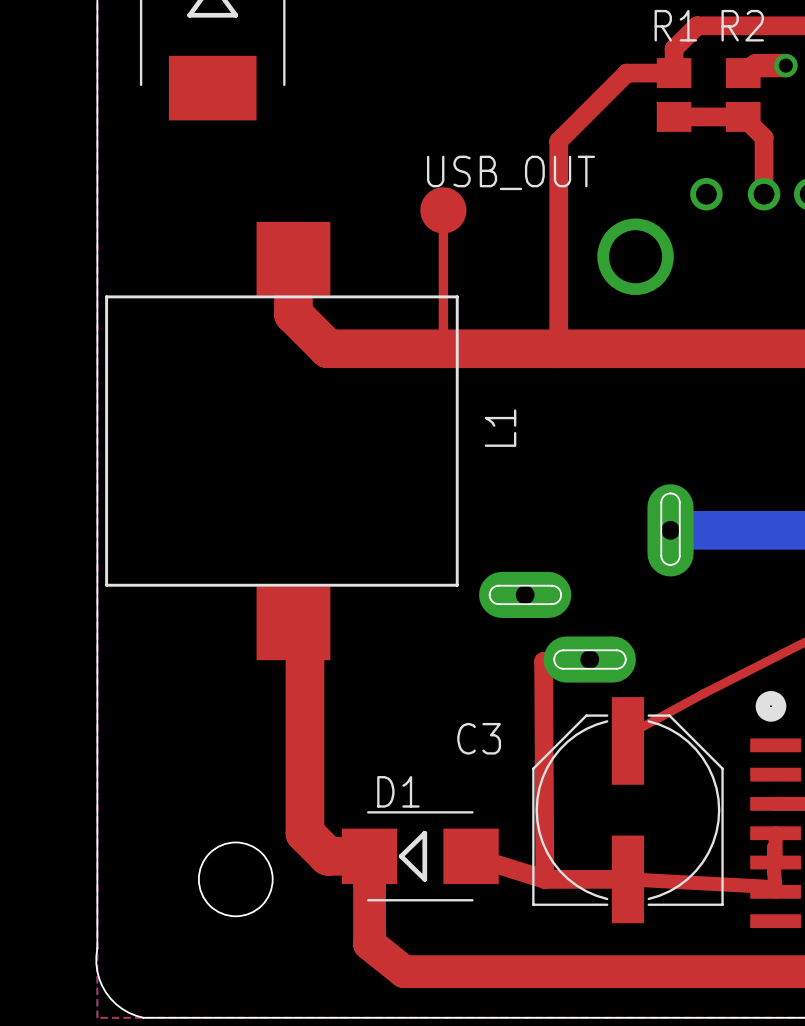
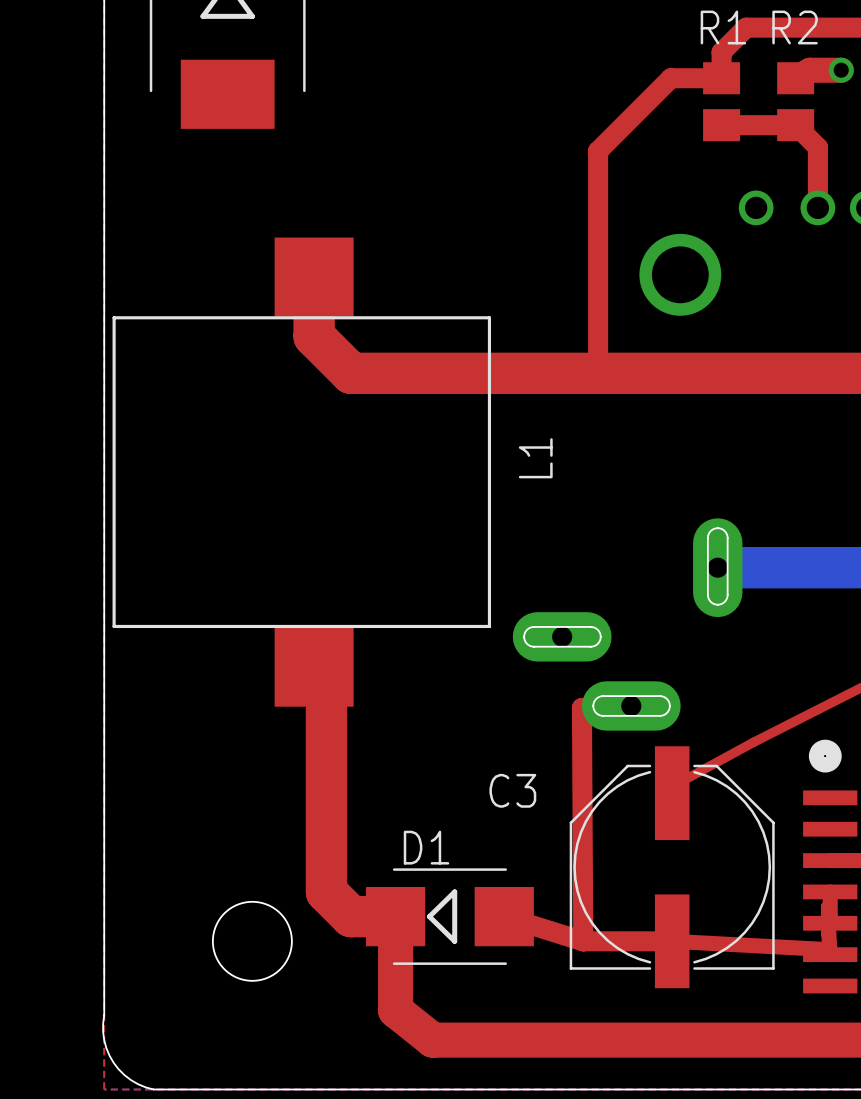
top track: (443, 210) (443, 348) -> none
USB_OUT: (443, 210) -> none

